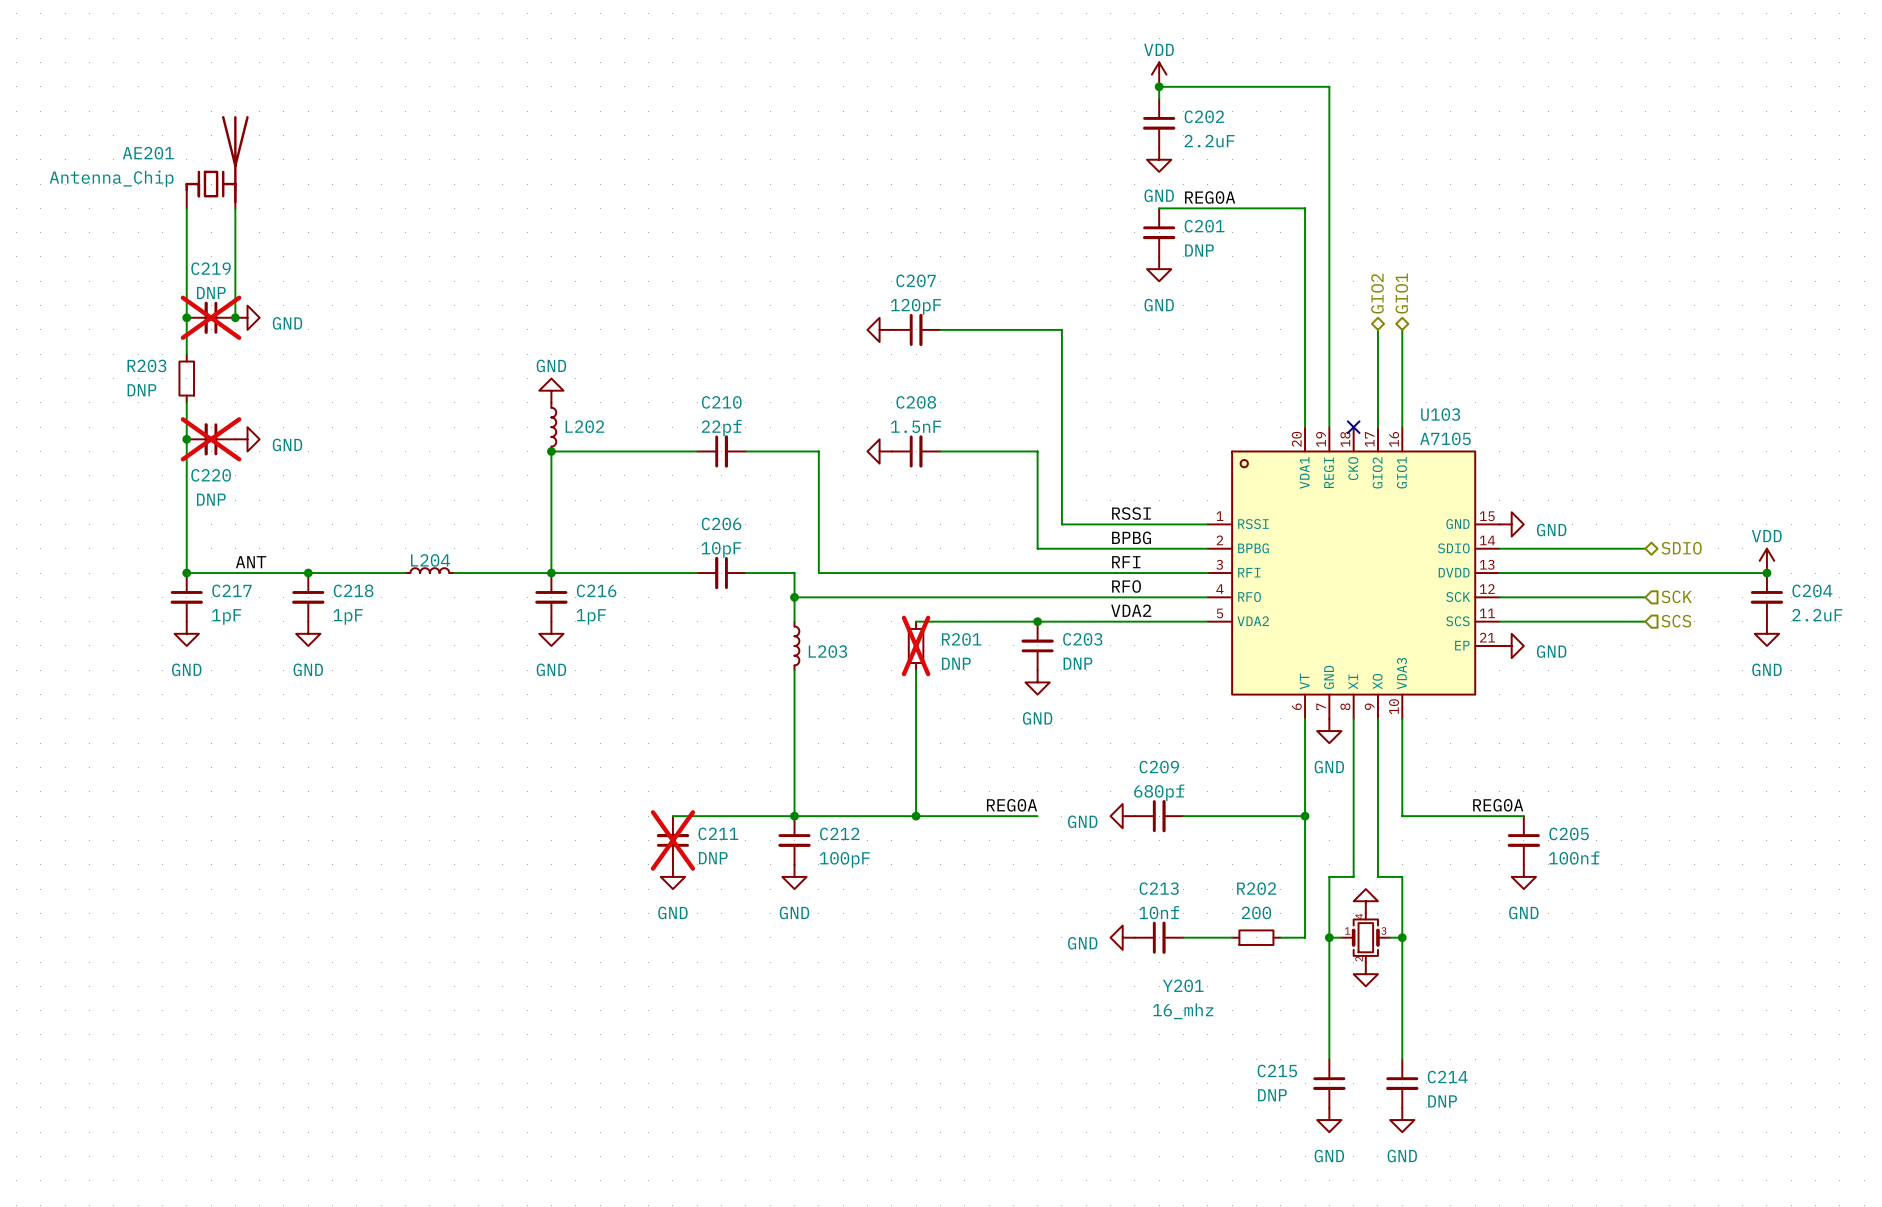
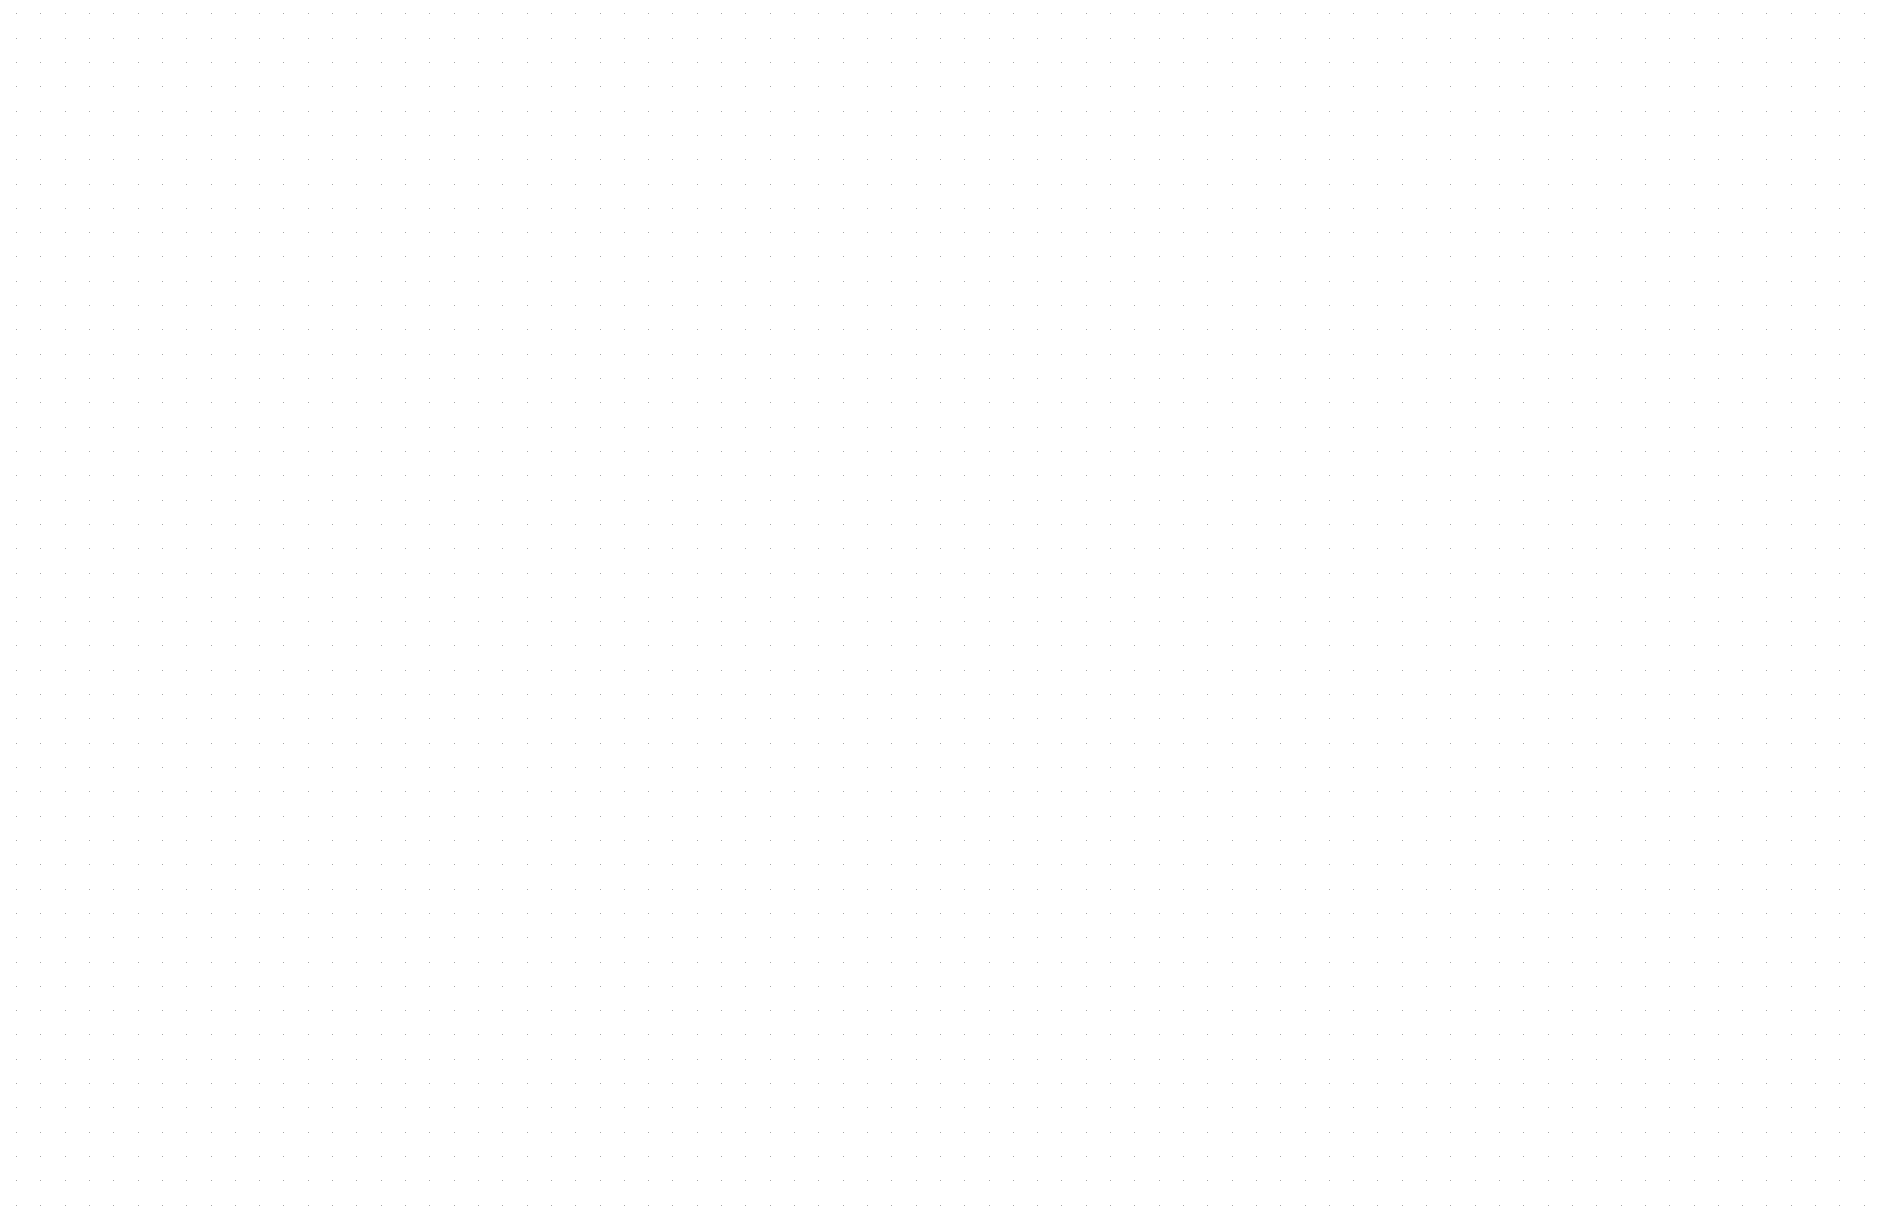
power symbol: VDD (1159, 74) -> none
junction: (1159, 86) -> none
wire: (1159, 98) (1159, 86) (1329, 86) (1329, 427) -> none
C202: (1159, 123) -> none
power symbol: GND (1159, 159) -> none
AE201: Antenna_Chip (217, 162) -> none
label: REG0A (1210, 197) -> none
wire: (186, 208) (186, 354) -> none
wire: (235, 208) (235, 317) -> none
wire: (1159, 208) (1305, 208) (1305, 427) -> none
C201: (1159, 232) -> none
power symbol: GND (1159, 269) -> none
hierarchical label: GIO2 (1377, 293) -> none
hierarchical label: GIO1 (1401, 293) -> none
junction: (186, 317) -> none
C219: (211, 317) -> none
junction: (235, 317) -> none
power symbol: GND (247, 317) -> none
power symbol: (879, 329) -> none
C207: (916, 329) -> none
wire: (940, 329) (1061, 329) (1061, 524) (1207, 524) -> none
wire: (1377, 329) (1377, 427) -> none
wire: (1402, 329) (1402, 427) -> none
R203: DNP (186, 378) -> none
power symbol: GND (551, 390) -> none
wire: (186, 402) (186, 573) (405, 573) -> none
L202: (553, 427) -> none
no-connect mark: (1353, 427) -> none
junction: (186, 439) -> none
C220: (211, 439) -> none
power symbol: GND (247, 439) -> none
junction: (551, 451) -> none
wire: (697, 451) (551, 451) (551, 573) -> none
C210: (721, 451) -> none
wire: (745, 451) (818, 451) (818, 573) (1207, 573) -> none
power symbol: (879, 451) -> none
C208: (916, 451) -> none
wire: (940, 451) (1037, 451) (1037, 548) (1207, 548) -> none
label: RSSI (1131, 513) -> none
power symbol: GND (1511, 524) -> none
label: BPBG (1131, 537) -> none
wire: (1499, 548) (1645, 548) -> none
hierarchical label: SDIO (1681, 548) -> none
power symbol: VDD (1766, 560) -> none
label: ANT (251, 562) -> none
label: RFI (1126, 562) -> none
L204: (429, 570) -> none
junction: (186, 573) -> none
junction: (308, 573) -> none
wire: (454, 573) (697, 573) -> none
junction: (551, 573) -> none
C206: (721, 573) -> none
wire: (745, 573) (794, 573) (794, 621) -> none
U103: A7105 (1353, 573) -> none
wire: (1499, 573) (1766, 573) -> none
junction: (1766, 573) -> none
label: RFO (1126, 586) -> none
hierarchical label: SCK (1676, 596) -> none
C217: (186, 597) -> none
C218: (308, 597) -> none
C216: (551, 597) -> none
wire: (794, 597) (1207, 597) -> none
junction: (794, 597) -> none
wire: (1499, 597) (1645, 597) -> none
C204: (1766, 597) -> none
label: VDA2 (1131, 610) -> none
wire: (916, 621) (1207, 621) -> none
junction: (1037, 621) -> none
wire: (1499, 621) (1645, 621) -> none
hierarchical label: SCS (1676, 621) -> none
power symbol: GND (186, 633) -> none
power symbol: GND (308, 633) -> none
power symbol: GND (551, 633) -> none
power symbol: GND (1766, 633) -> none
L203: (796, 645) -> none
R201: DNP (916, 645) -> none
C203: (1037, 645) -> none
power symbol: GND (1511, 645) -> none
wire: (794, 670) (794, 816) -> none
wire: (916, 670) (916, 816) -> none
power symbol: GND (1037, 682) -> none
wire: (1305, 718) (1305, 937) (1280, 937) -> none
wire: (1353, 718) (1353, 876) (1329, 876) (1329, 1059) -> none
wire: (1377, 718) (1377, 876) (1402, 876) (1402, 1059) -> none
wire: (1402, 718) (1402, 816) (1523, 816) -> none
power symbol: GND (1329, 731) -> none
label: REG0A (1012, 805) -> none
label: REG0A (1498, 805) -> none
wire: (672, 816) (1037, 816) -> none
junction: (794, 816) -> none
junction: (916, 816) -> none
power symbol: GND (1122, 816) -> none
C209: (1159, 816) -> none
wire: (1183, 816) (1305, 816) -> none
junction: (1305, 816) -> none
C211: (672, 840) -> none
C212: (794, 840) -> none
C205: (1523, 840) -> none
power symbol: GND (672, 876) -> none
power symbol: GND (794, 876) -> none
power symbol: GND (1523, 876) -> none
power symbol: (1365, 901) -> none
power symbol: GND (1122, 937) -> none
C213: (1159, 937) -> none
wire: (1183, 937) (1232, 937) -> none
R202: 200 (1256, 937) -> none
wire: (1329, 937) (1341, 937) -> none
junction: (1329, 937) -> none
Y201: 16_mhz (1365, 937) -> none
wire: (1390, 937) (1402, 937) -> none
junction: (1402, 937) -> none
power symbol: (1365, 974) -> none
C215: (1329, 1083) -> none
C214: (1402, 1083) -> none
power symbol: GND (1329, 1120) -> none
power symbol: GND (1402, 1120) -> none

